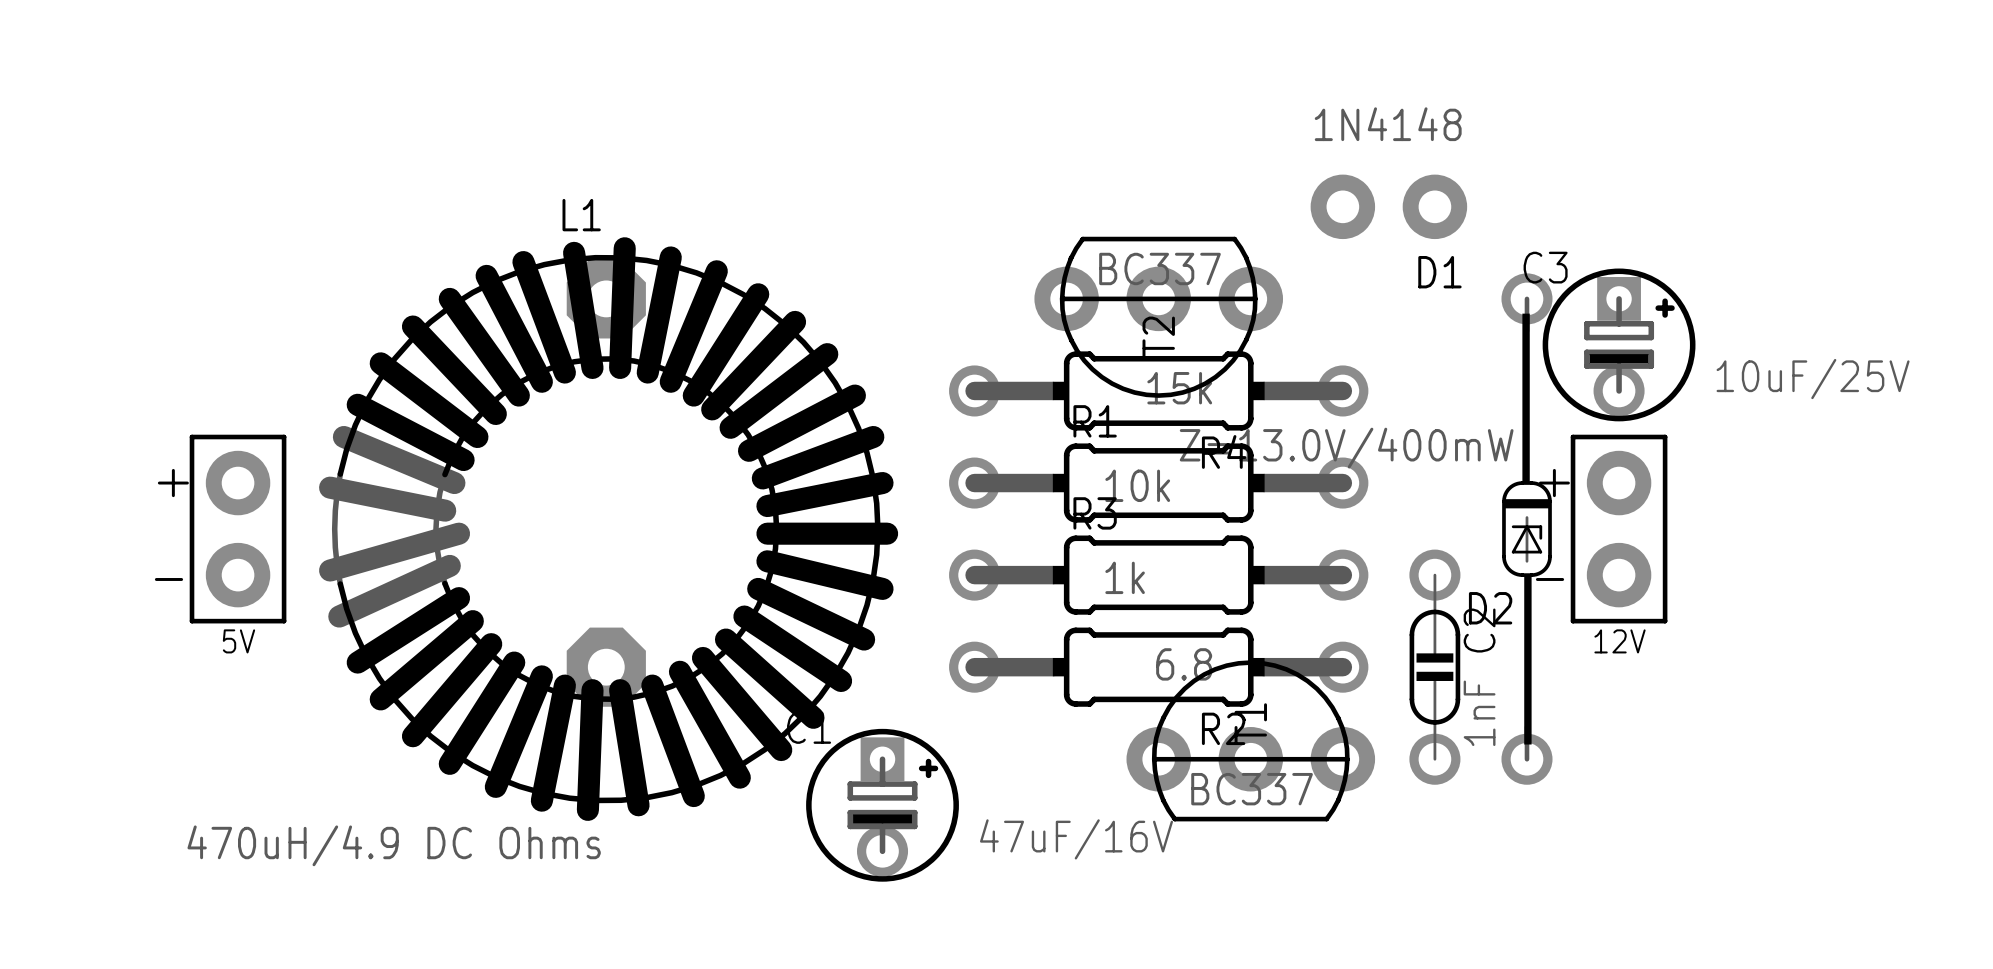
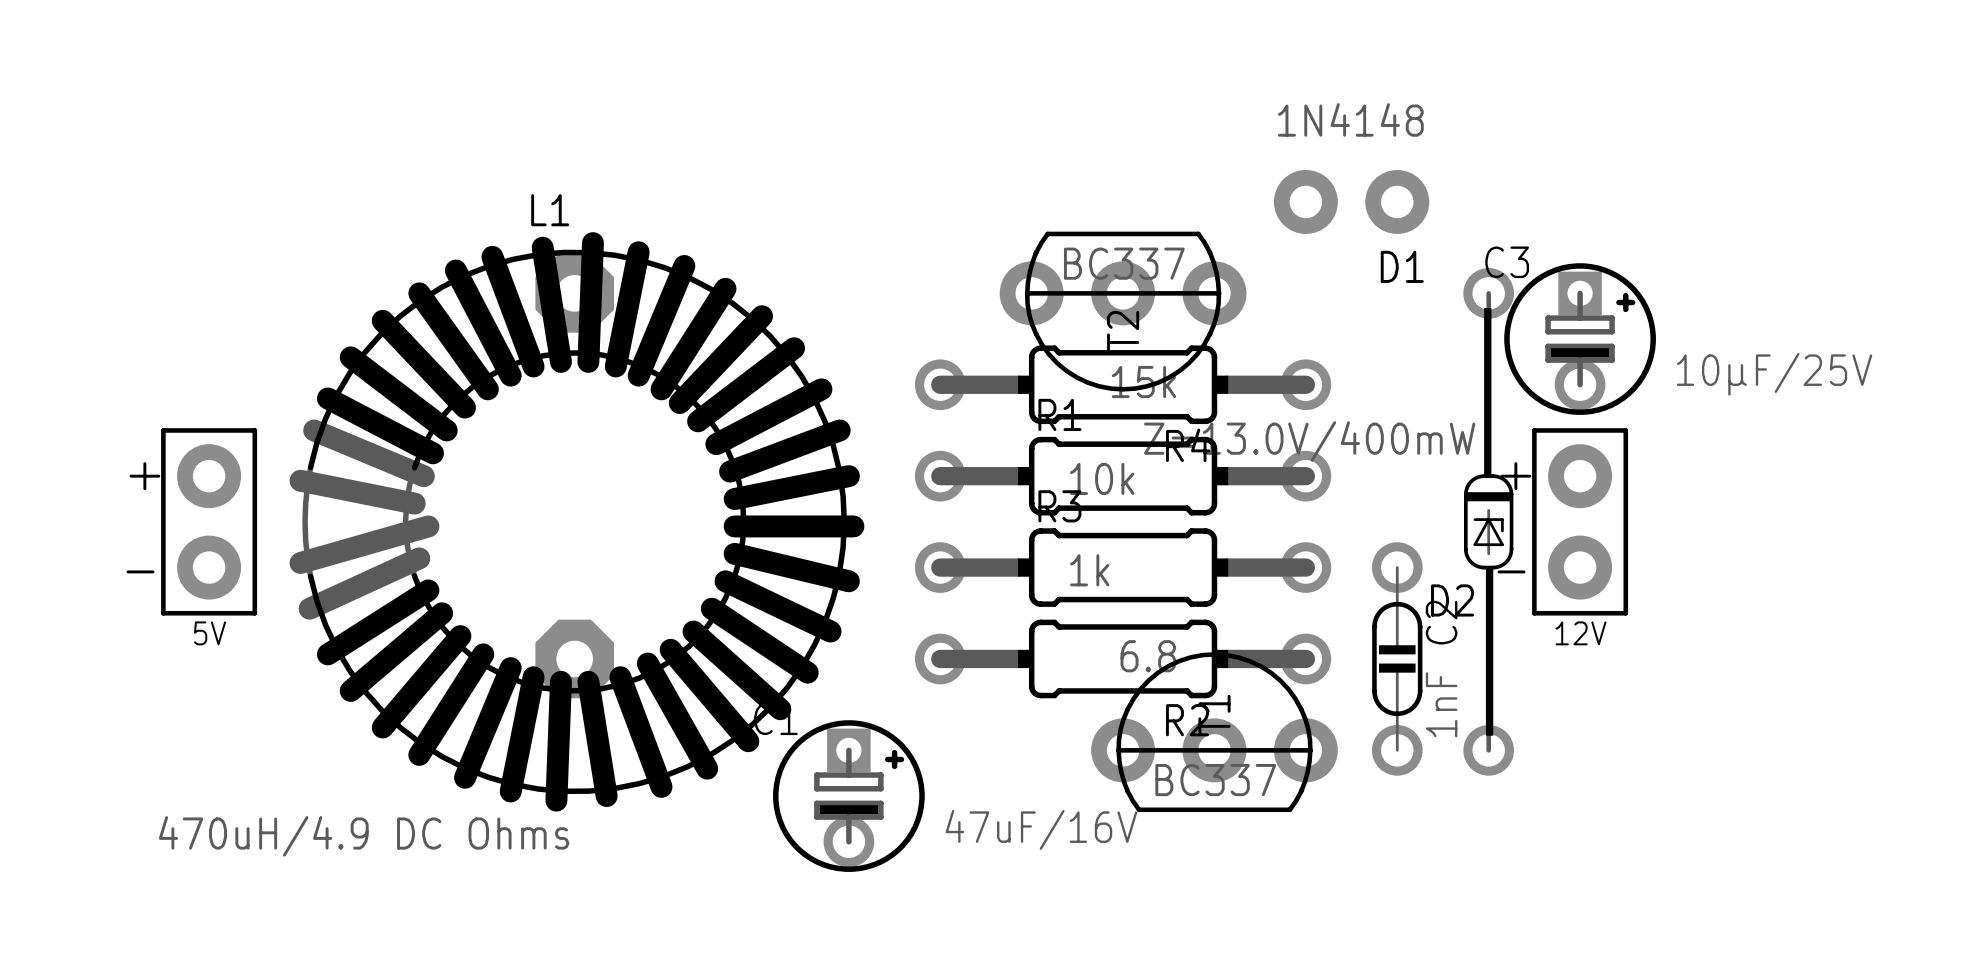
C3 value: 10uF/25V (1813, 379) -> 10μF/25V (1774, 374)

